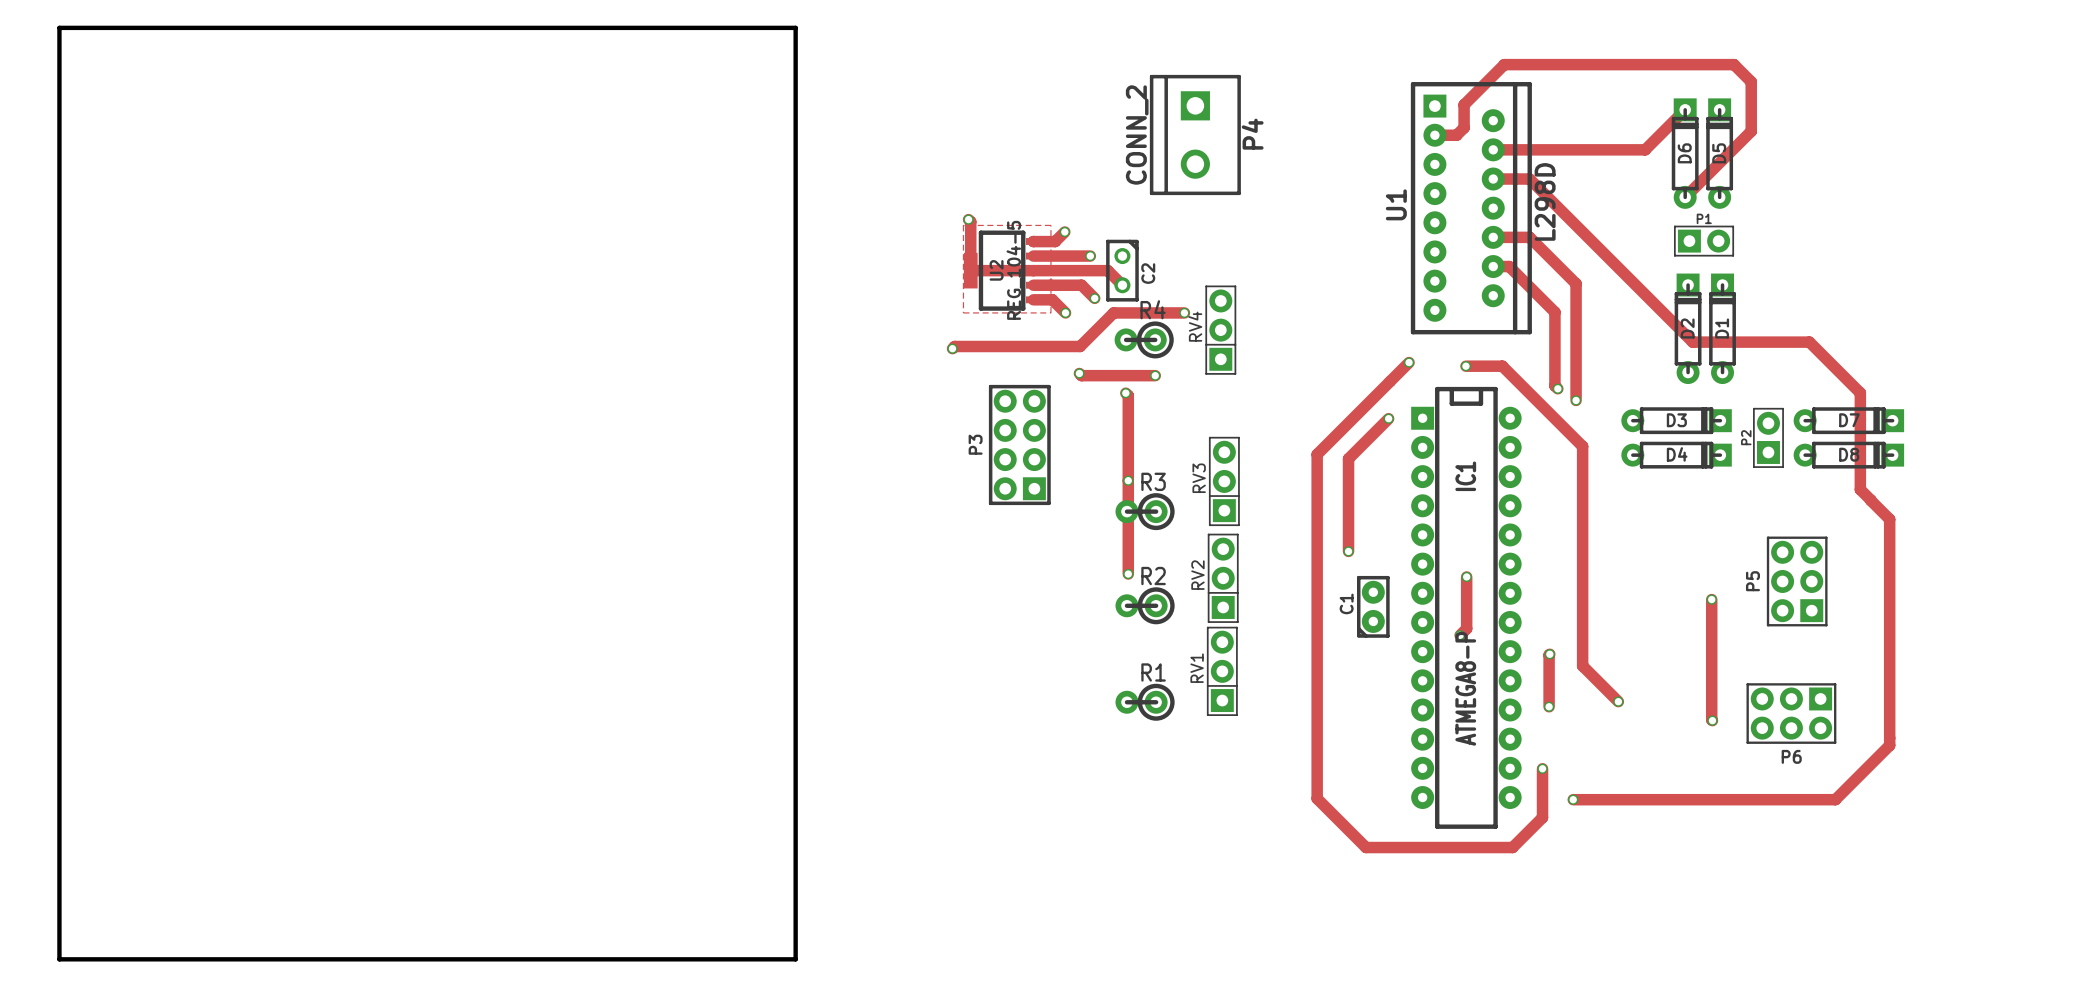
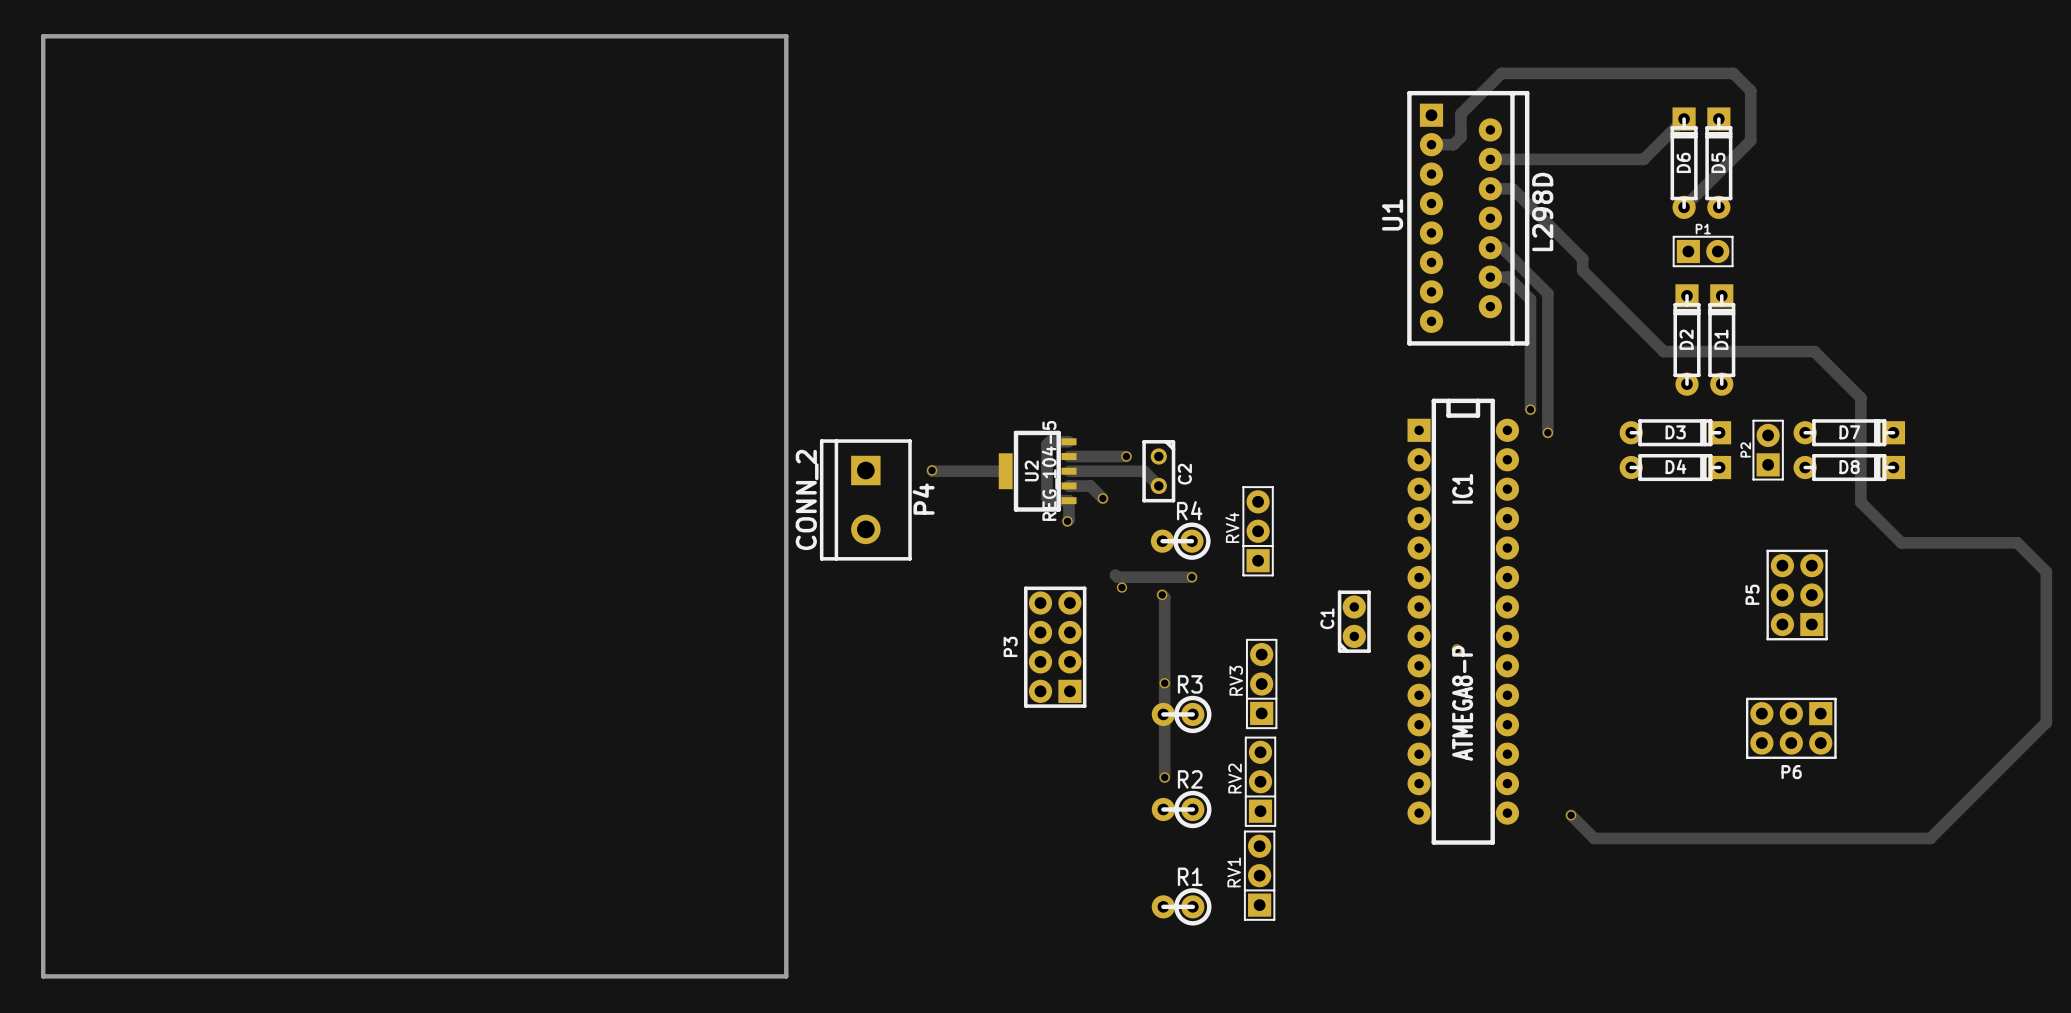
P4 position: (1195, 134) -> (865, 499)
track: (1515, 179) (1529, 179) (1692, 342) (1809, 342) (1860, 393) -> (1512, 188) (1582, 258) (1582, 270) (1663, 351) (1814, 351) (1860, 397) (1860, 404)
track: (968, 219) (970, 221) (970, 270) (1107, 270) (1122, 285) -> none
via: (968, 219) -> none
zone outline: (963, 225) (1050, 225) (1050, 312) (963, 312) (963, 225) -> none
track: (1064, 231) (1055, 241) (1033, 241) -> none
via: (1064, 231) -> none
track: (1504, 237) (1529, 237) (1576, 283) (1576, 400) -> (1501, 247) (1547, 293) (1547, 432)
track: (1033, 256) (1090, 256) -> (1069, 456) (1126, 456)
via: (1090, 256) -> none
track: (1509, 266) (1554, 312) (1554, 385) (1557, 388) -> (1506, 277) (1530, 299) (1530, 409)
U2 position: (1002, 270) -> (1037, 471)
C2 position: (1122, 270) -> (1158, 471)
track: (1033, 285) (1081, 285) (1094, 298) -> none
via: (1094, 298) -> none
track: (1033, 299) (1052, 299) (1065, 312) -> none
via: (1065, 312) -> none
track: (1184, 312) (1113, 312) (1080, 346) (954, 346) (952, 348) -> none
via: (1184, 312) -> none
RV4 position: (1220, 330) -> (1258, 531)
R4 position: (1144, 339) -> (1180, 541)
via: (952, 348) -> none
track: (1409, 362) (1317, 454) (1317, 798) (1366, 847) (1512, 847) (1542, 817) (1542, 768) -> none
via: (1409, 362) -> none
track: (1465, 366) (1502, 366) (1582, 446) (1582, 665) (1618, 701) -> none
via: (1465, 366) -> none
track: (1079, 373) (1081, 375) (1155, 375) -> (1115, 575) (1117, 577) (1191, 577)
via: (1079, 373) -> none
via: (1155, 375) -> none
via: (1557, 388) -> none
track: (1125, 393) (1128, 395) (1128, 574) -> (1162, 594) (1164, 597) (1164, 777)
via: (1125, 393) -> none
via: none -> (1530, 409)
via: (1576, 400) -> none
track: (1388, 418) (1348, 458) (1348, 551) -> none
via: (1388, 418) -> none
via: none -> (1547, 432)
track: none -> (1069, 441) (1049, 441) (1046, 444) (1046, 497) (1049, 500) (1069, 500) (1067, 521)
P3 position: (1019, 444) -> (1055, 647)
via: none -> (1126, 456)
track: none -> (932, 470) (1005, 471)
via: none -> (932, 470)
track: none -> (1069, 471) (1144, 471) (1158, 485)
track: none -> (1069, 486) (1090, 486) (1102, 498)
via: (1128, 480) -> none
RV3 position: (1224, 481) -> (1261, 684)
via: none -> (1102, 498)
track: (1870, 500) (1889, 519) (1889, 745) (1835, 799) (1573, 799) -> (1871, 512) (1901, 542) (2017, 542) (2046, 571) (2046, 722) (1930, 838) (1594, 838) (1571, 815)
via: none -> (1067, 521)
R3 position: (1145, 511) -> (1181, 714)
via: (1348, 551) -> none
via: none -> (1191, 577)
track: (1466, 576) (1466, 628) (1460, 635) -> none
via: (1466, 576) -> none
RV2 position: (1223, 578) -> (1260, 781)
via: none -> (1162, 594)
track: (1711, 599) (1712, 720) -> none
via: (1711, 599) -> none
R2 position: (1145, 605) -> (1181, 809)
C1 position: (1373, 606) -> (1354, 621)
track: (1549, 654) (1549, 706) -> none
via: (1549, 654) -> none
via: none -> (1164, 683)
RV1 position: (1222, 671) -> (1259, 875)
via: (1618, 701) -> none
R1 position: (1145, 702) -> (1181, 906)
via: (1549, 706) -> none
via: (1712, 720) -> none
via: none -> (1164, 777)
via: (1542, 768) -> none

